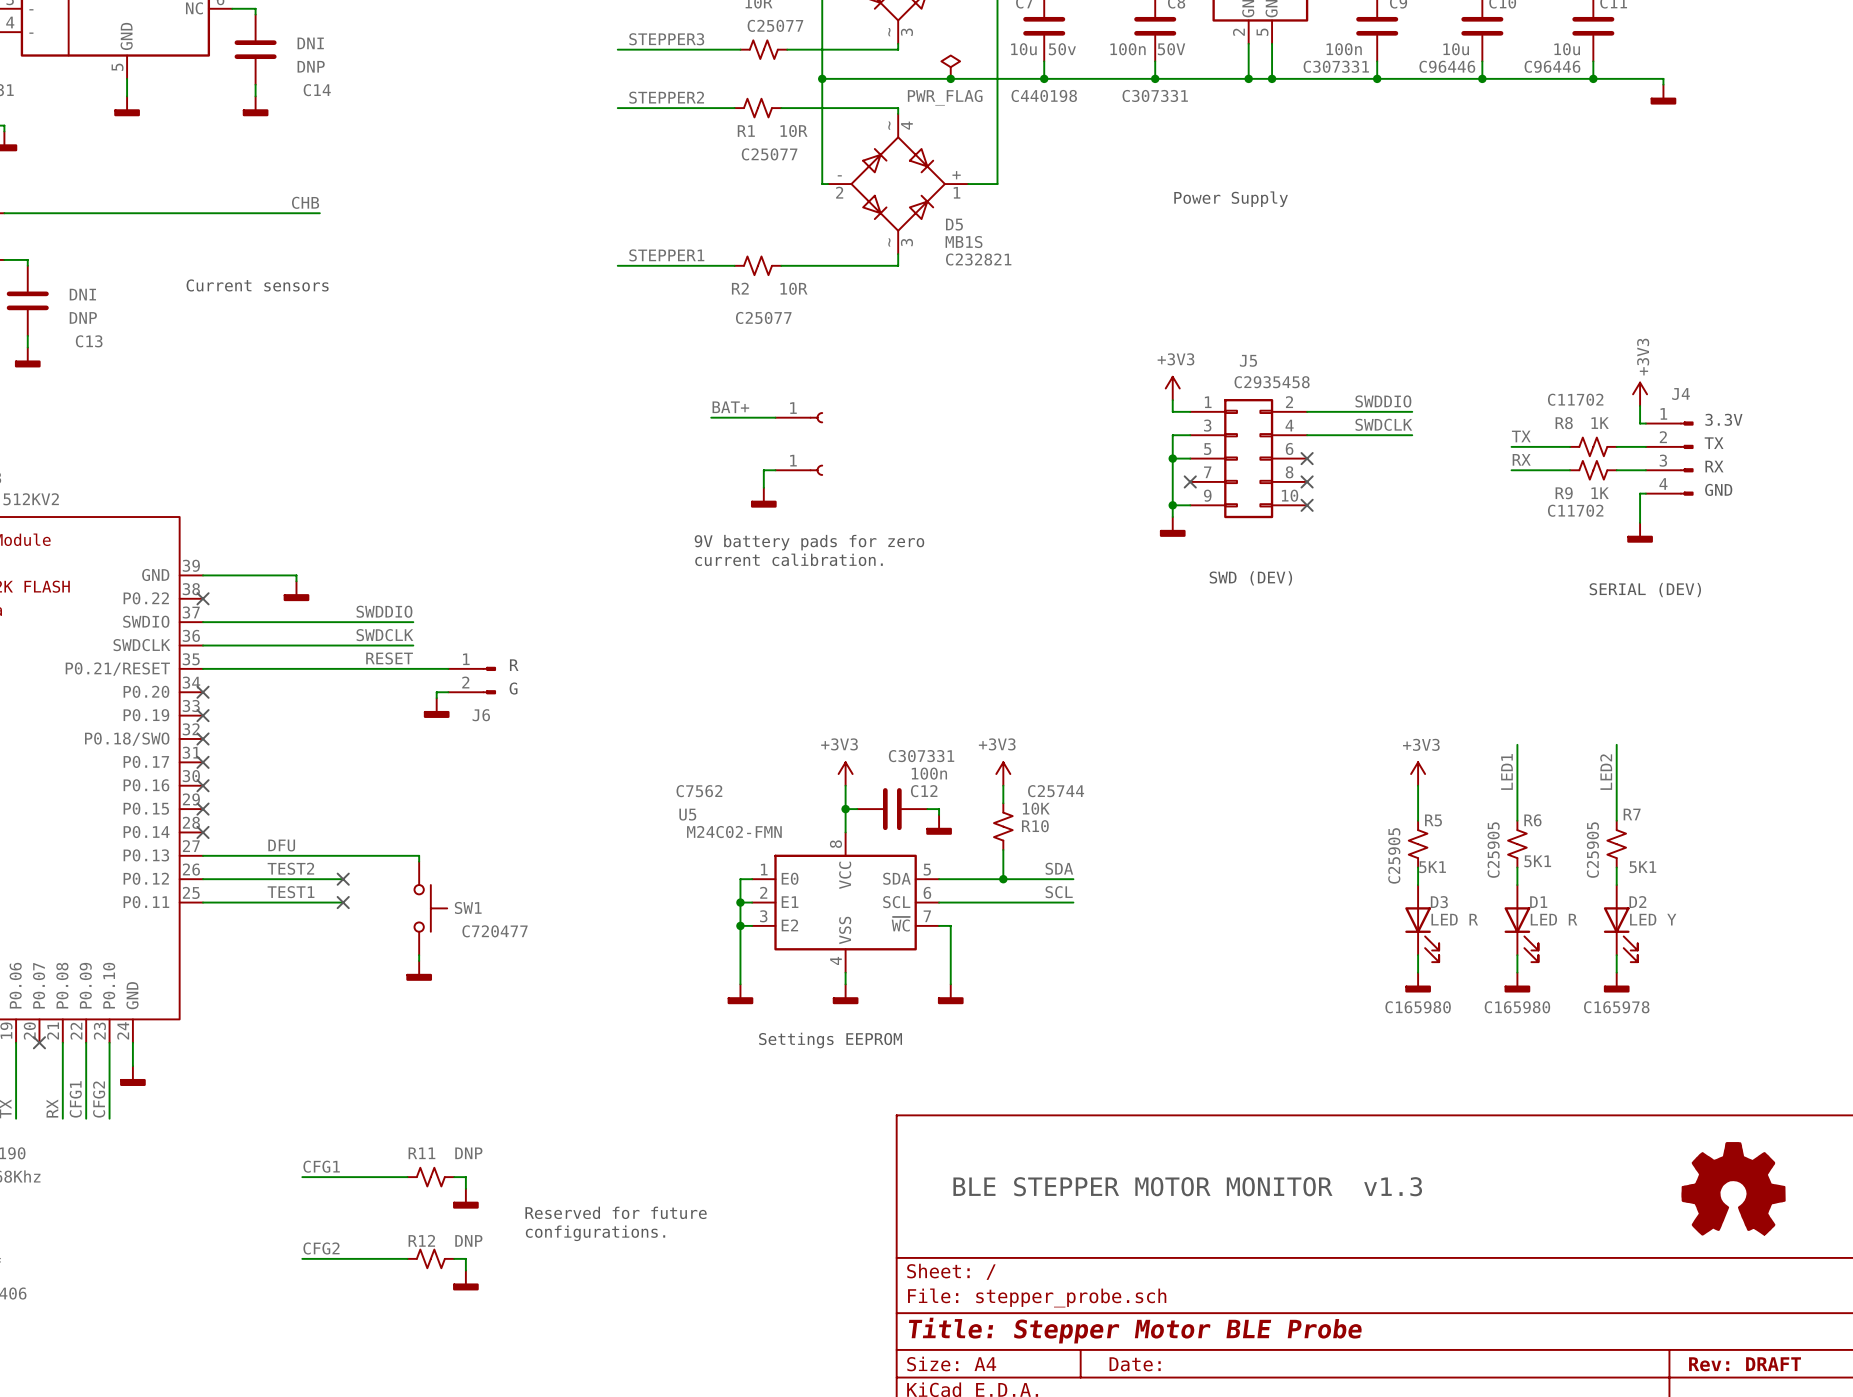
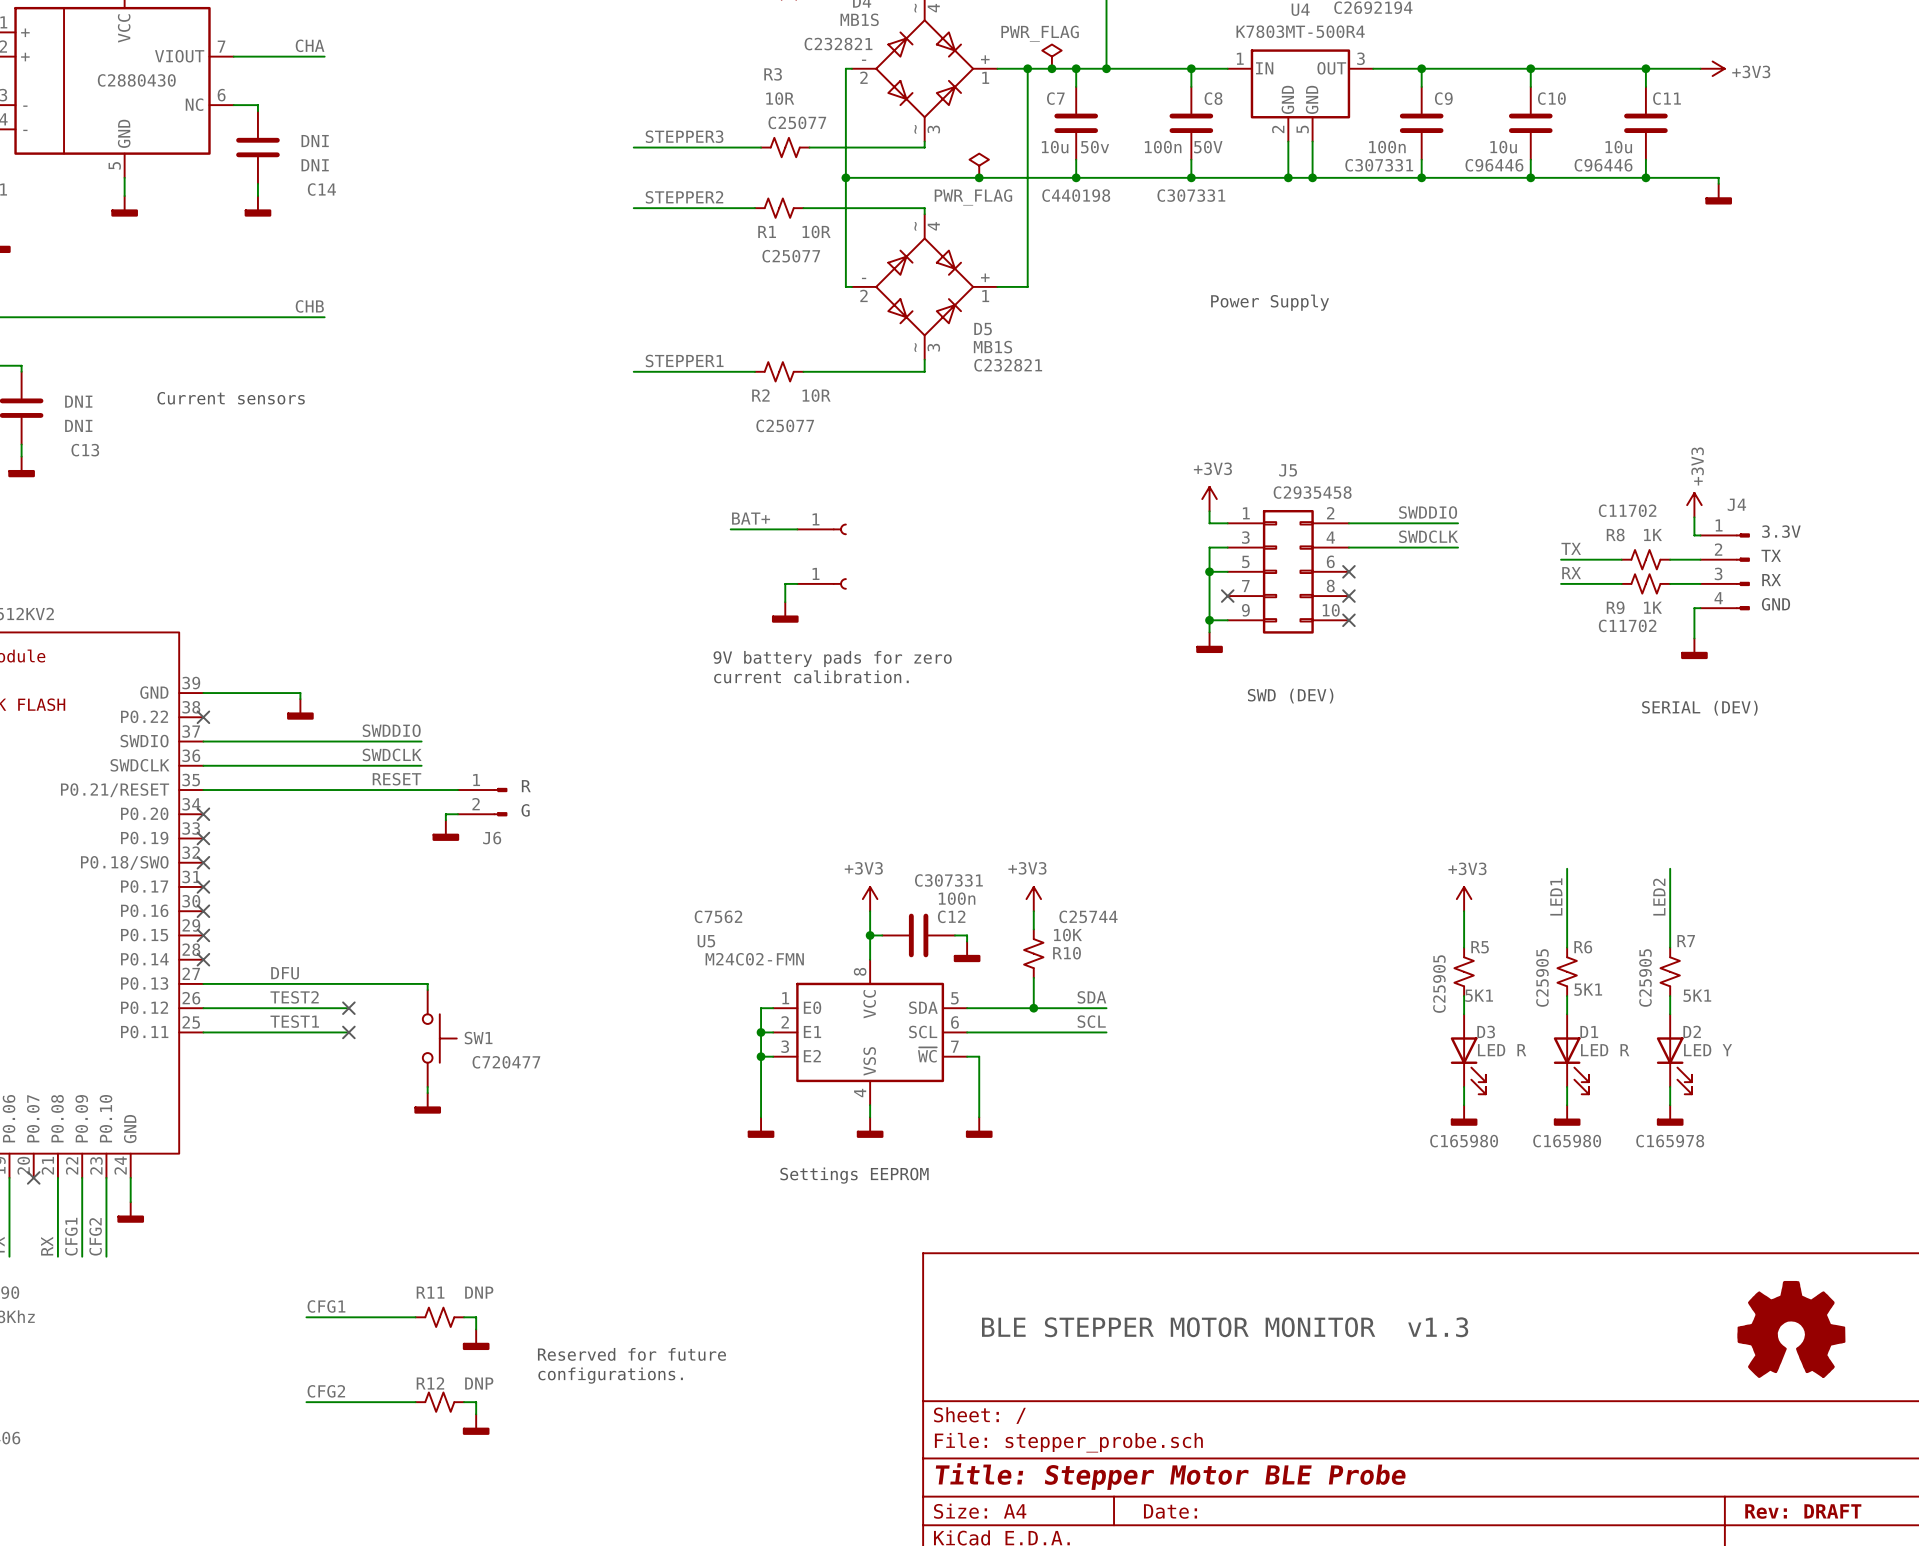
C14 text: DNP (311, 66) -> DNI (315, 165)
text position: Current sensors (257, 285) -> Current sensors (231, 398)
C13 text: DNP (83, 317) -> DNI (78, 425)

